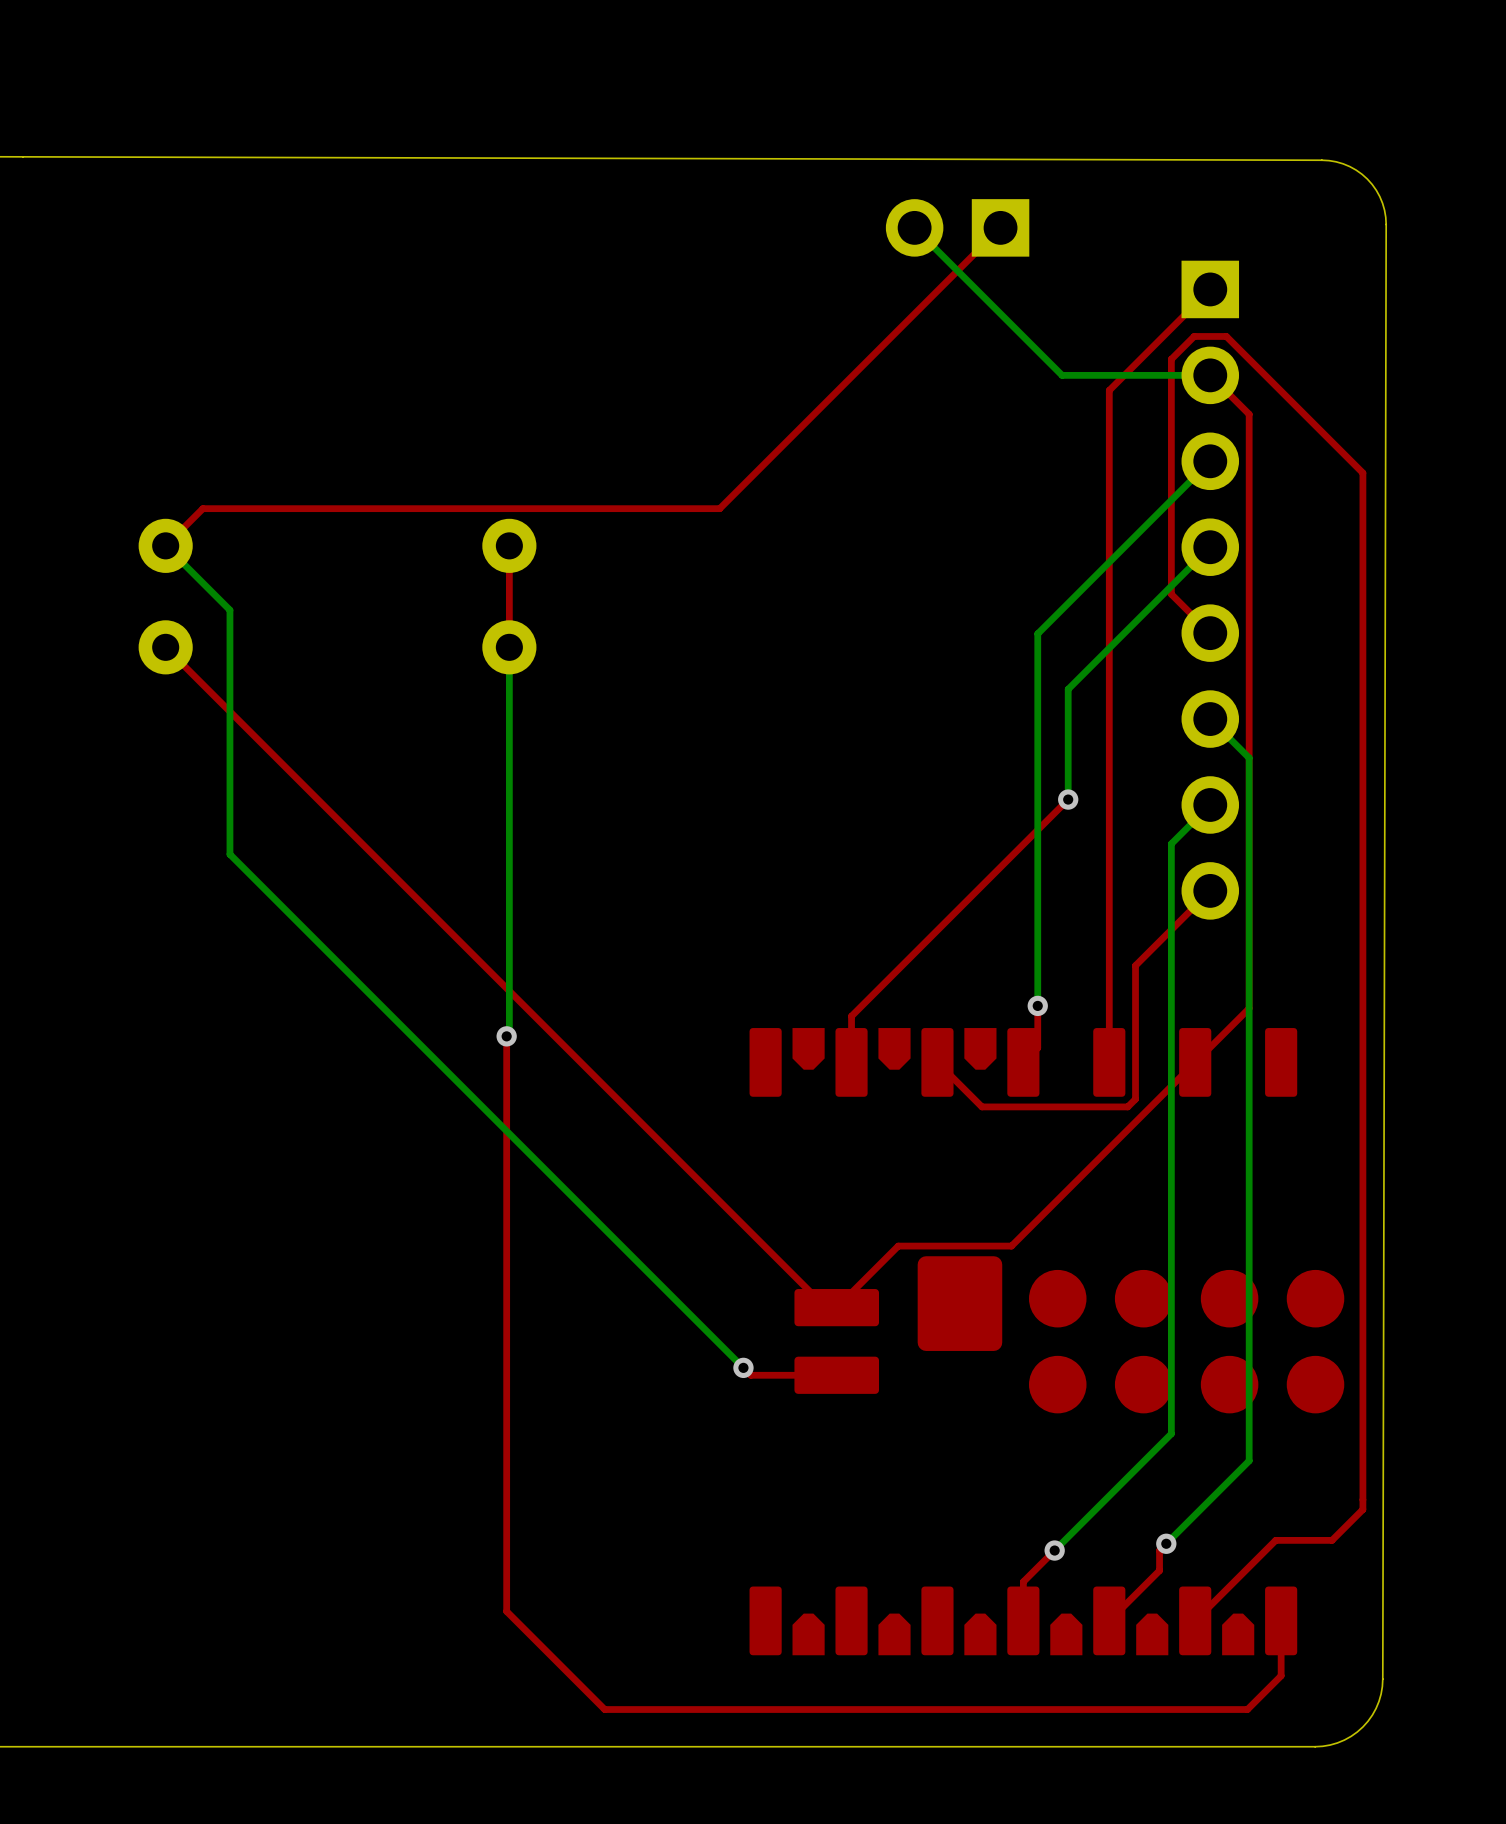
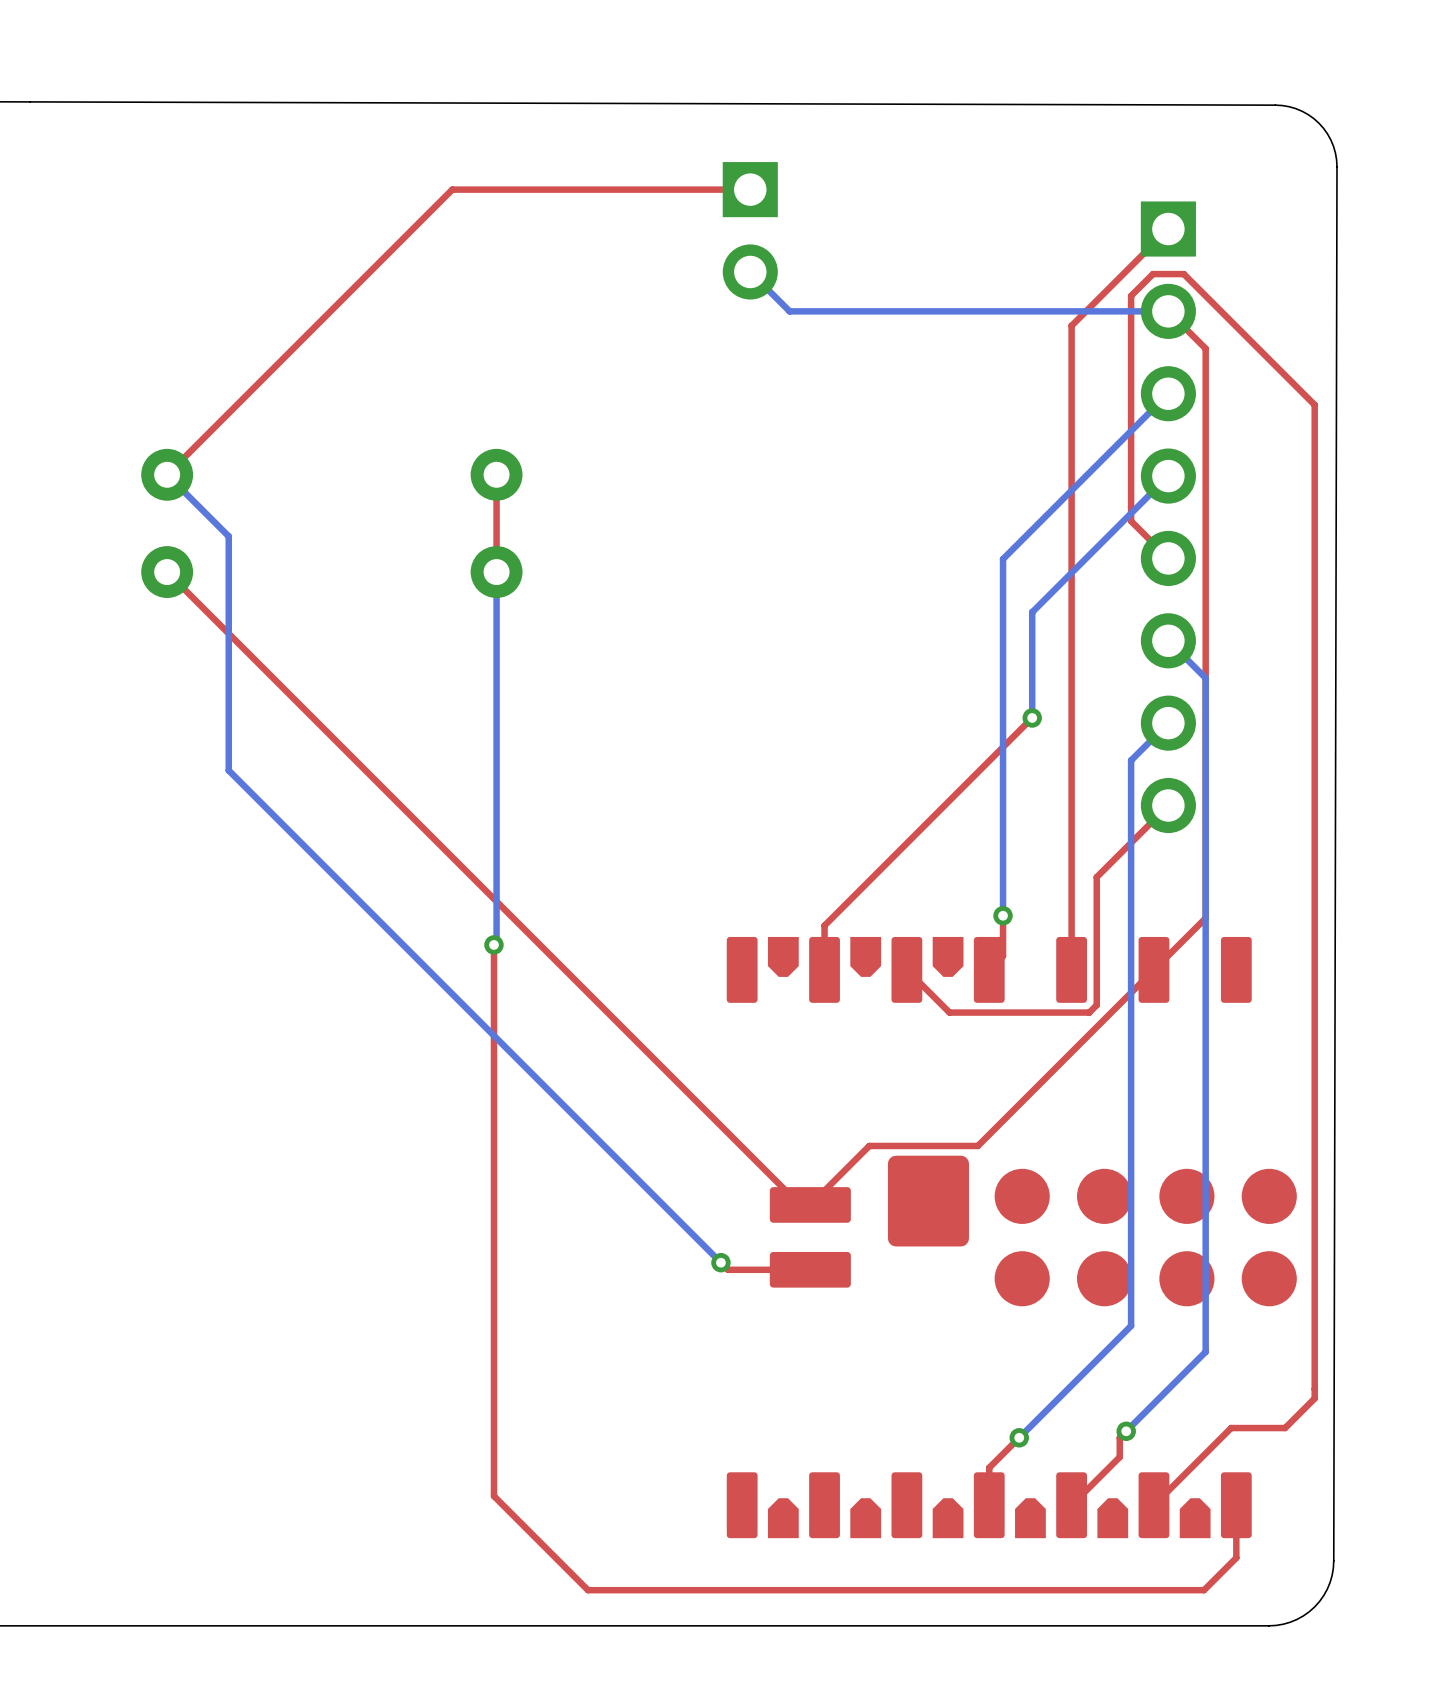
bottom track: (914, 227) (1062, 375) -> (750, 271) (789, 311) (1026, 311)
part rotation: 0° (957, 227) -> 90° counterclockwise (750, 230)
part position: (957, 227) -> (750, 230)
top track: (1000, 227) (719, 508) (202, 508) -> (750, 189) (452, 189) (202, 439)

